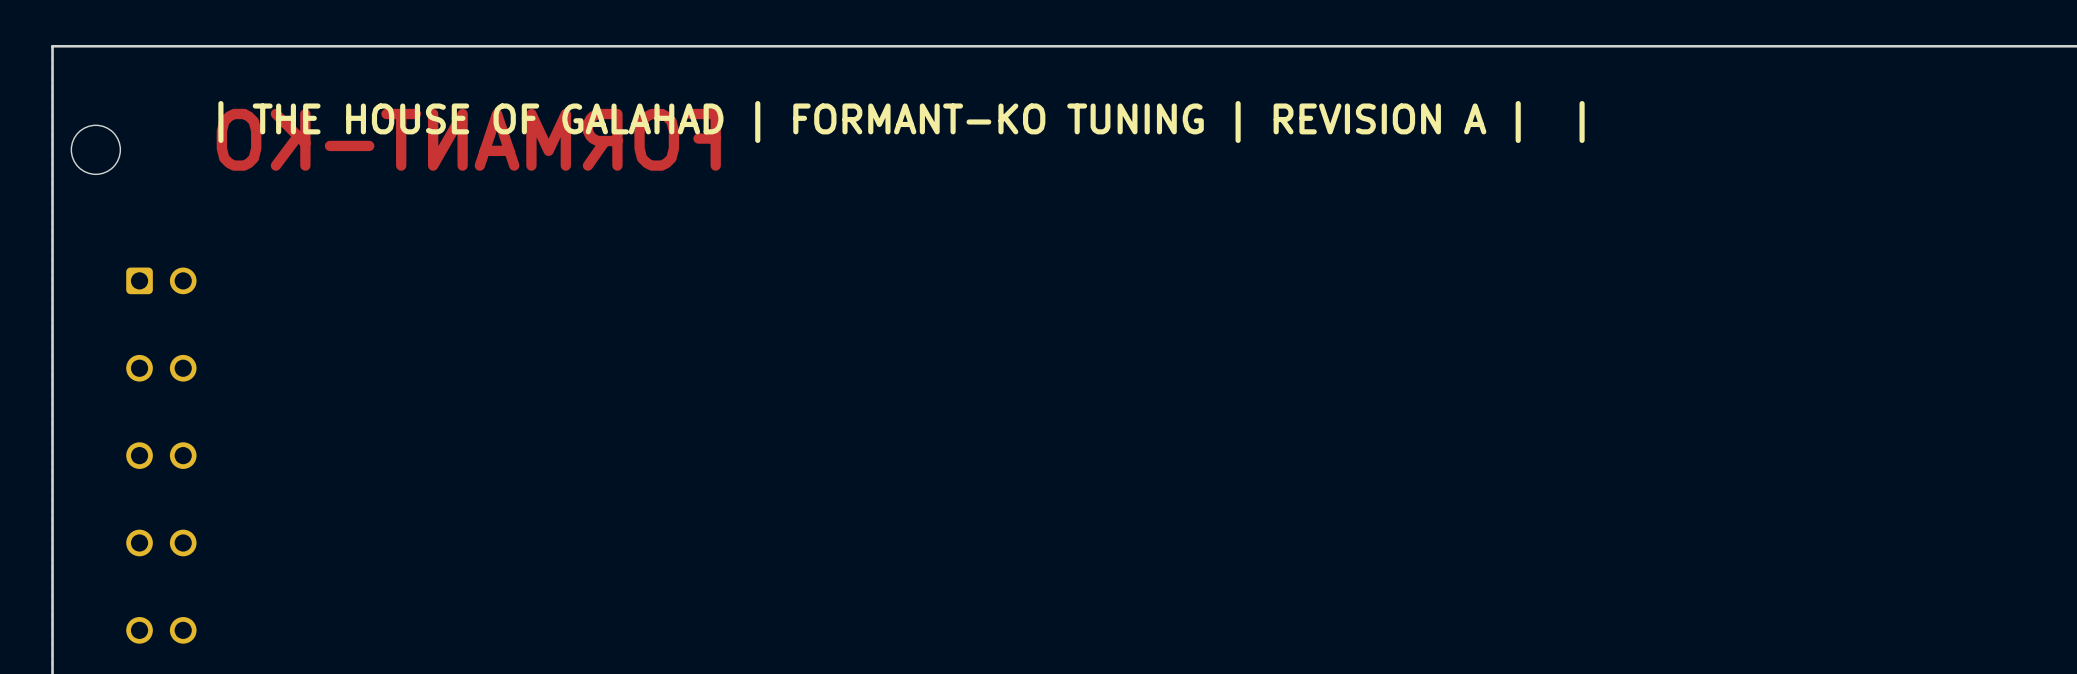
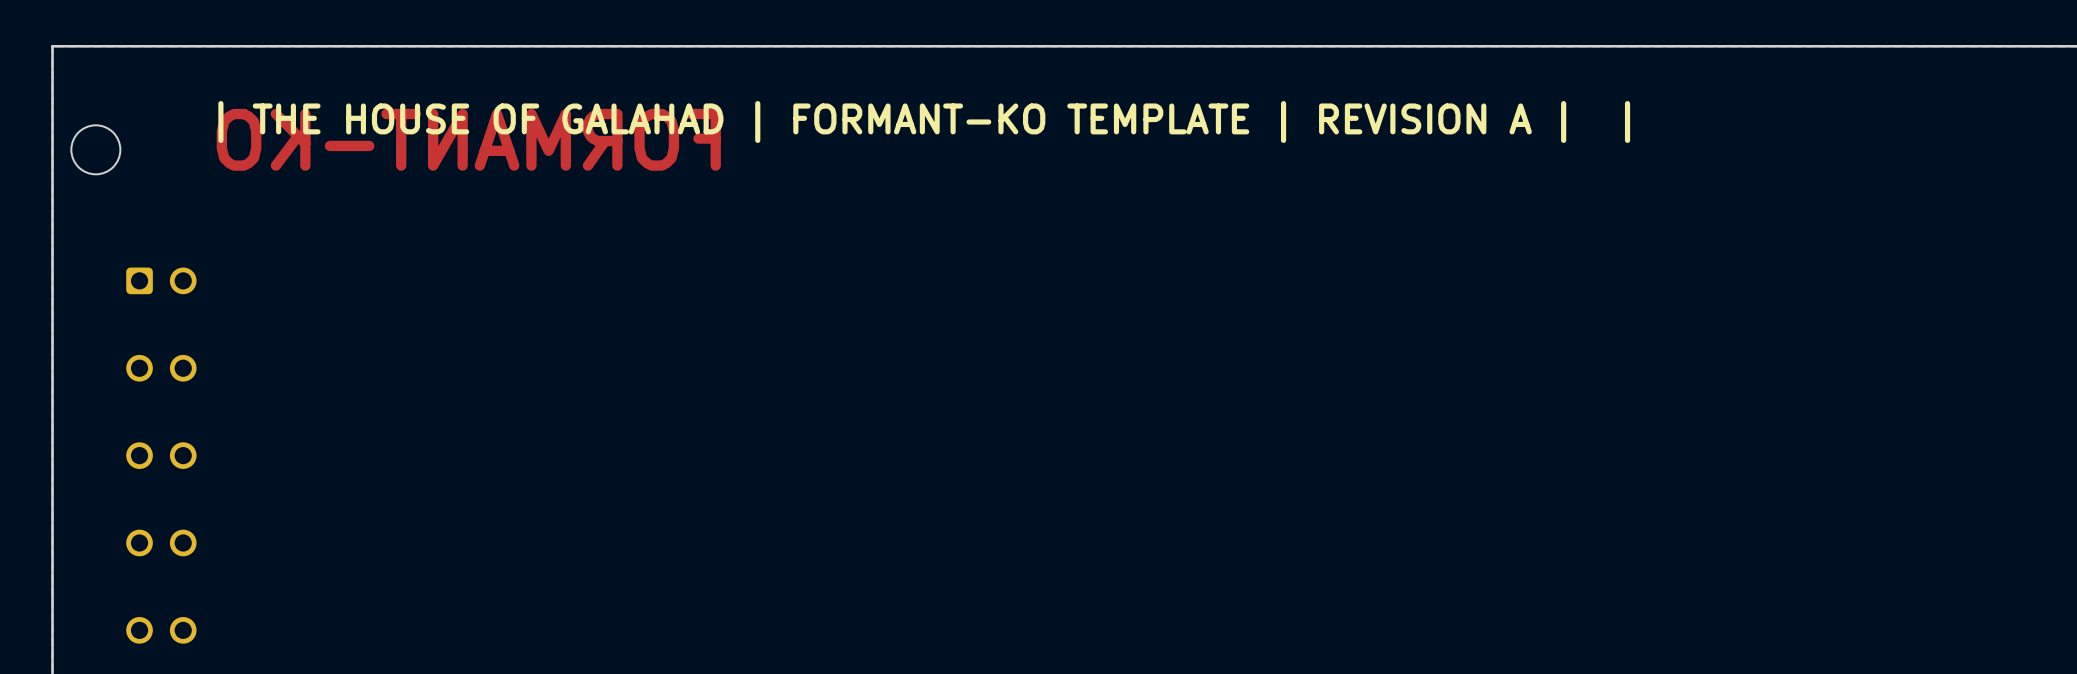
text: | THE HOUSE OF GALAHAD | FORMANT-KO TUNING | REVISION A | | (901, 122) -> | THE HOUSE OF GALAHAD | FORMANT-KO TEMPLATE | REVISION A | | (924, 122)

